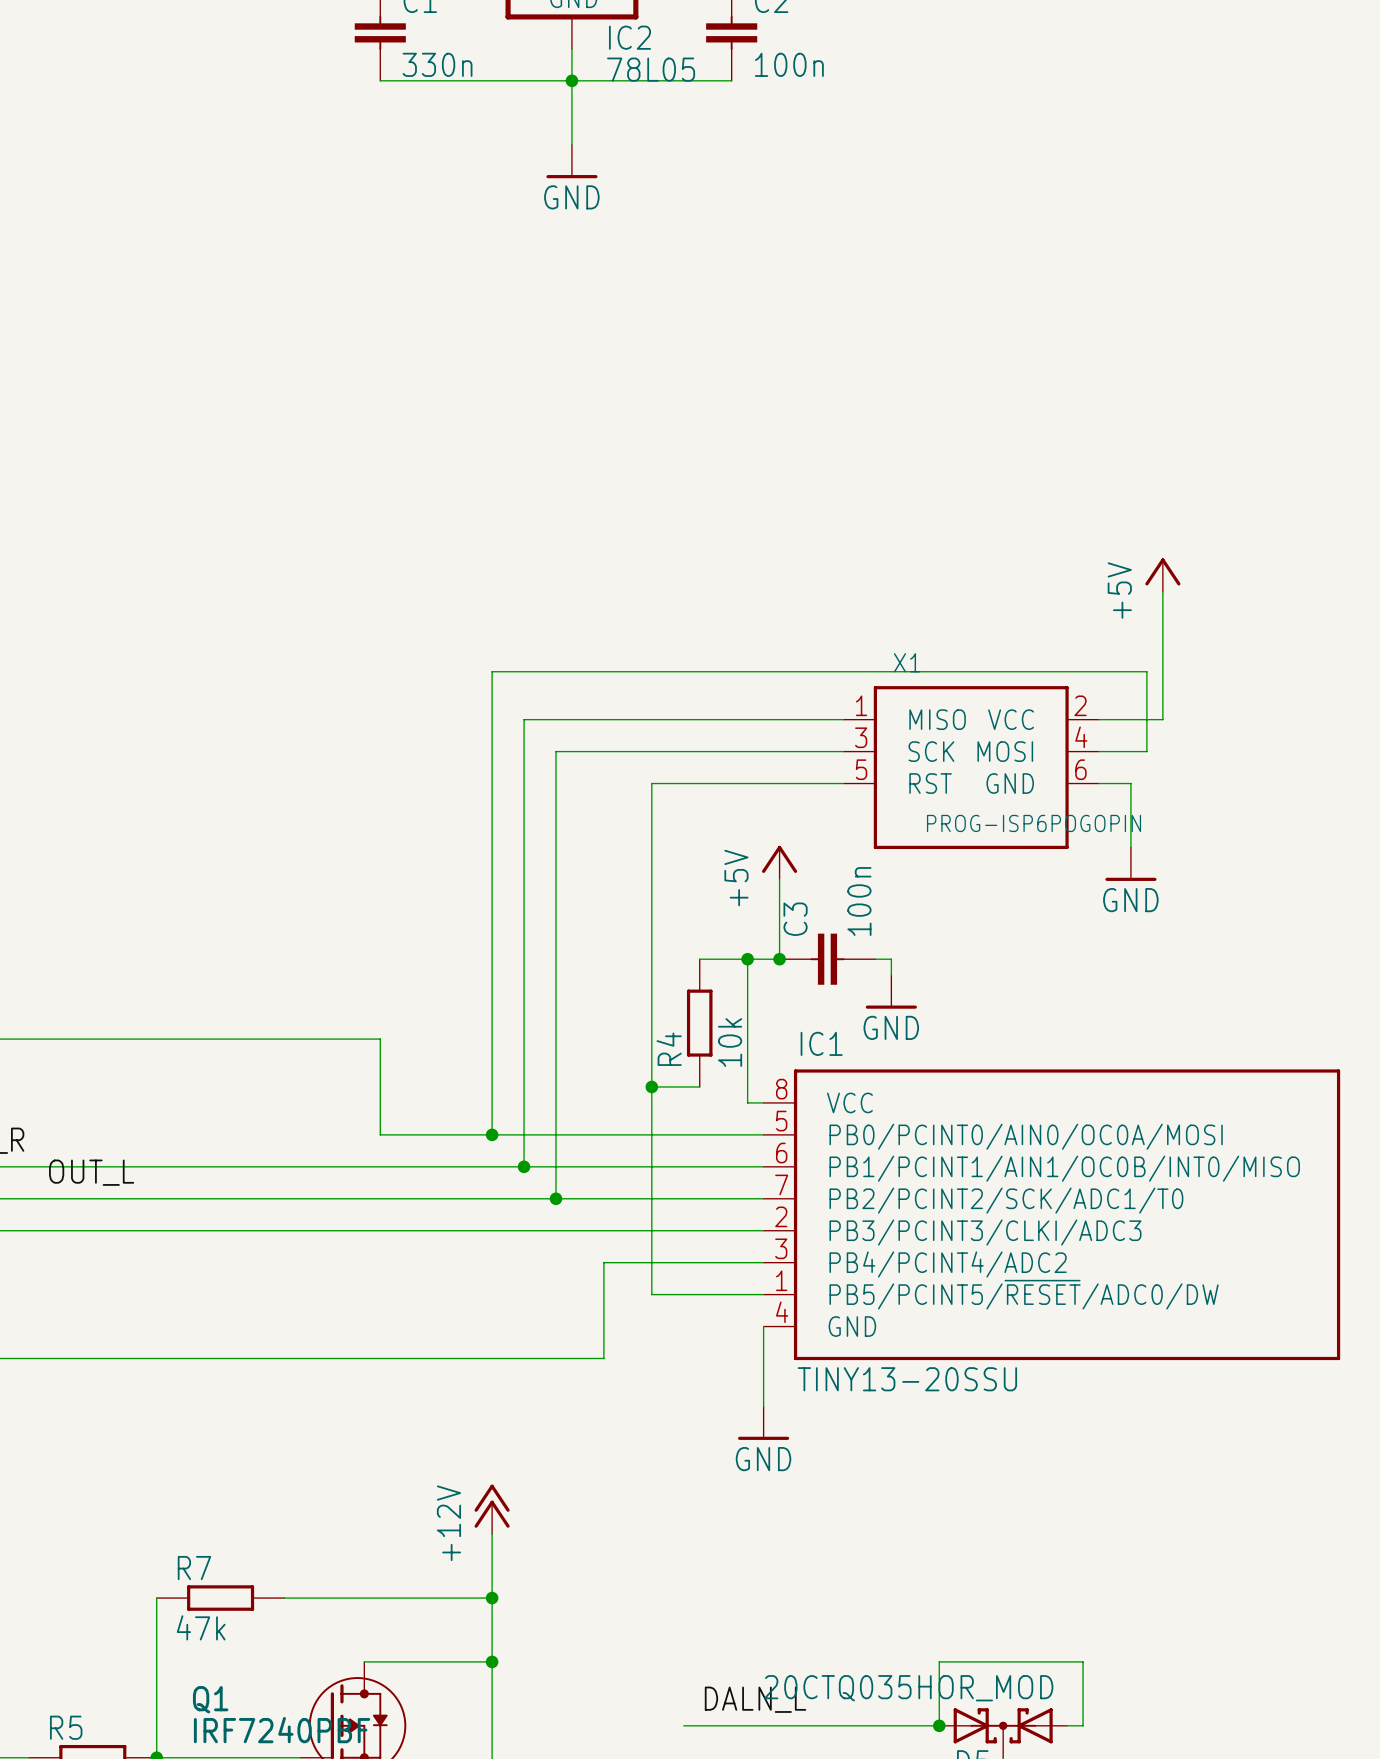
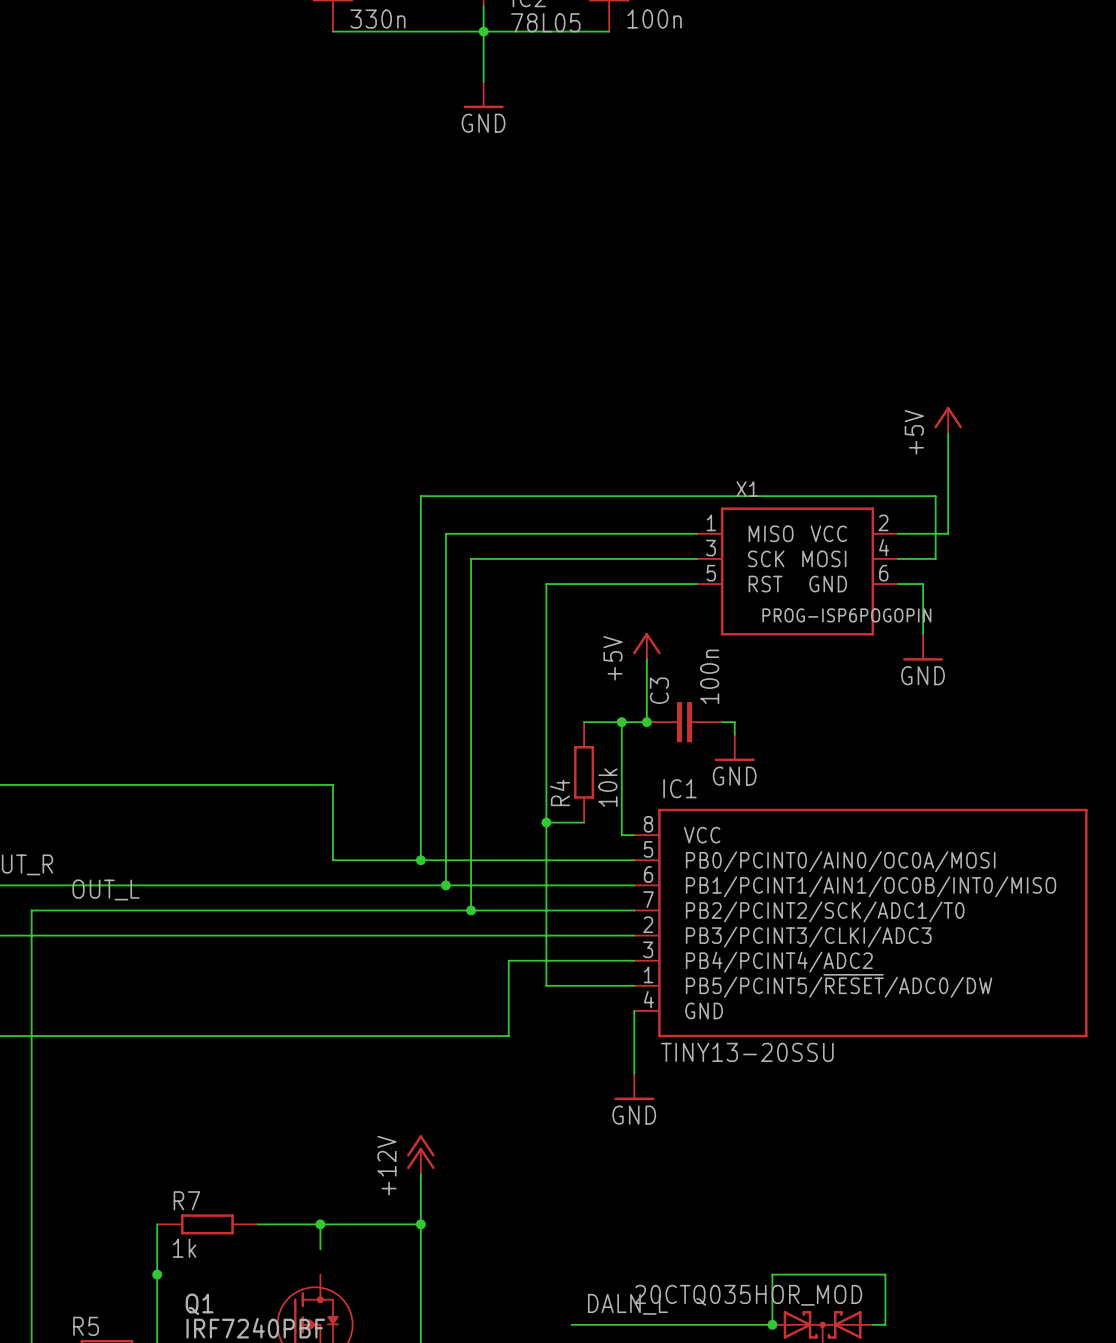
wire: none -> (320, 1224) (320, 1249)
junction: none -> (320, 1224)
R7 value: 47k (201, 1627) -> 1k (184, 1248)
junction: none -> (157, 1274)
wire: (364, 1661) (492, 1661) -> none
junction: (492, 1661) -> none

